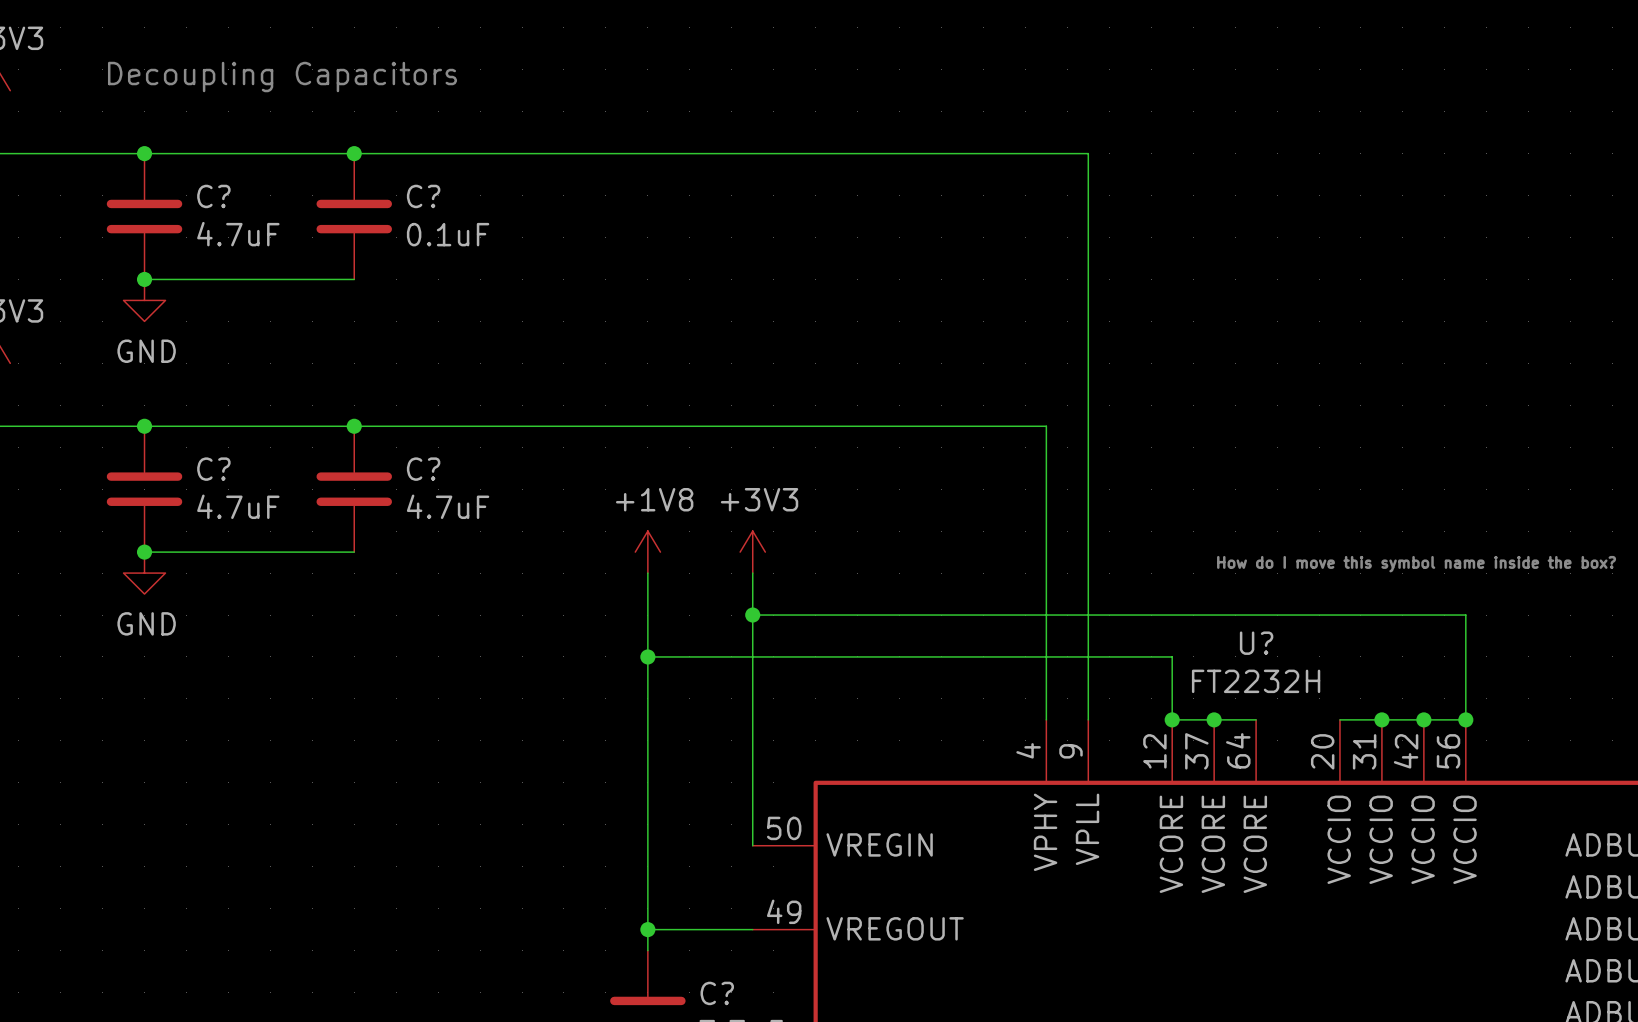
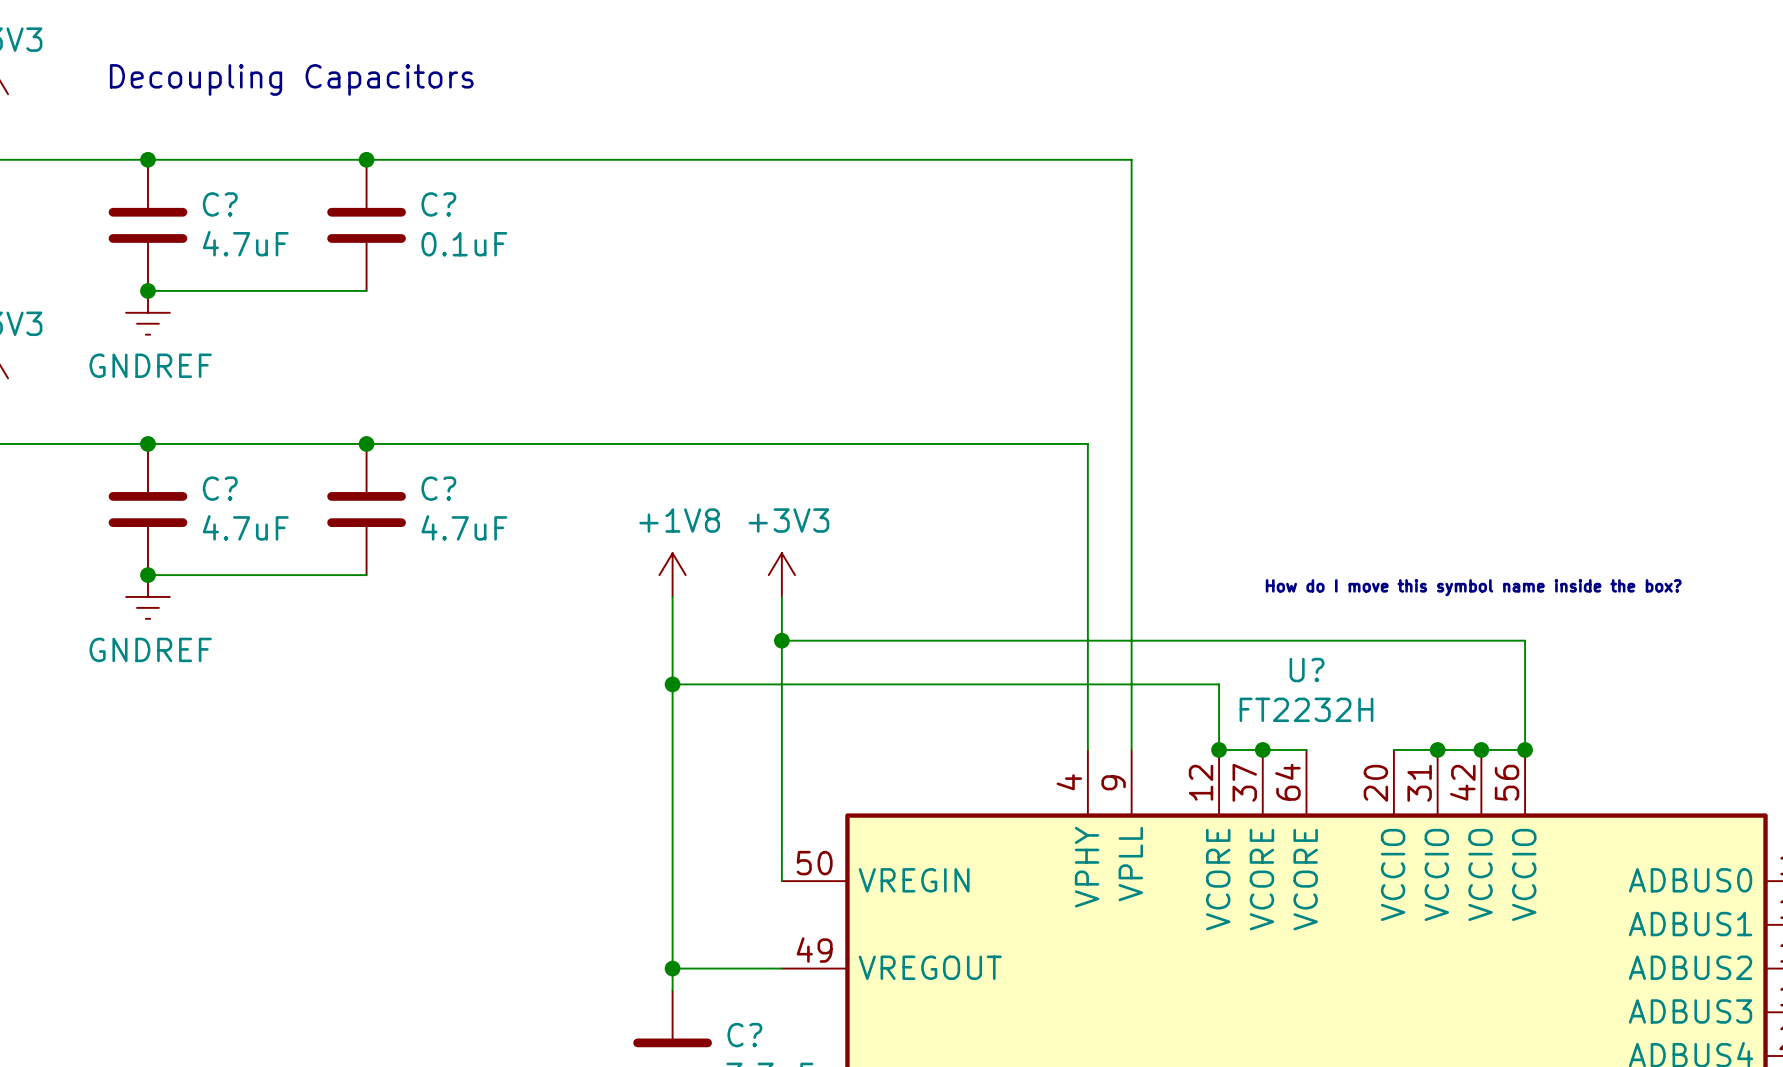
power symbol: GND (144, 300) -> GNDREF (147, 312)
power symbol: GND (144, 573) -> GNDREF (147, 596)

